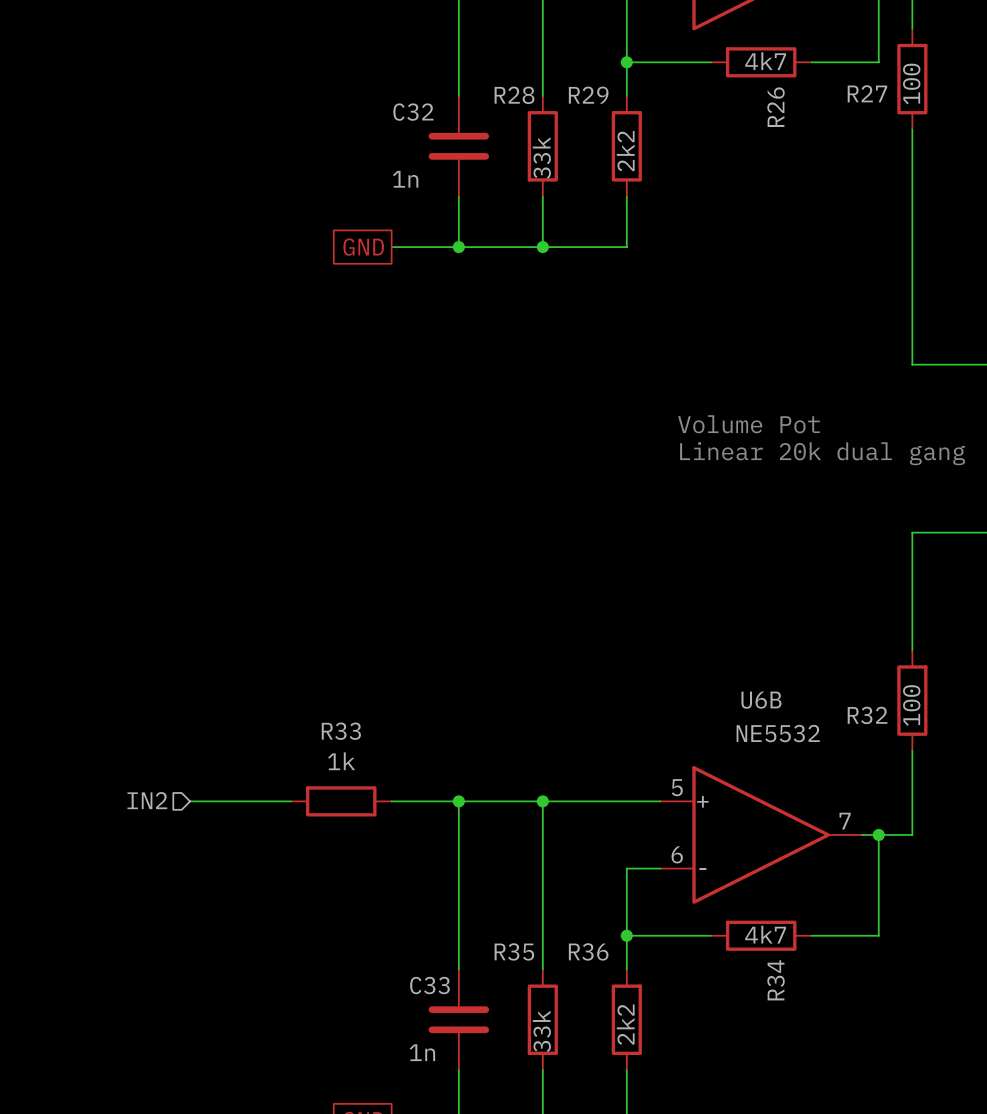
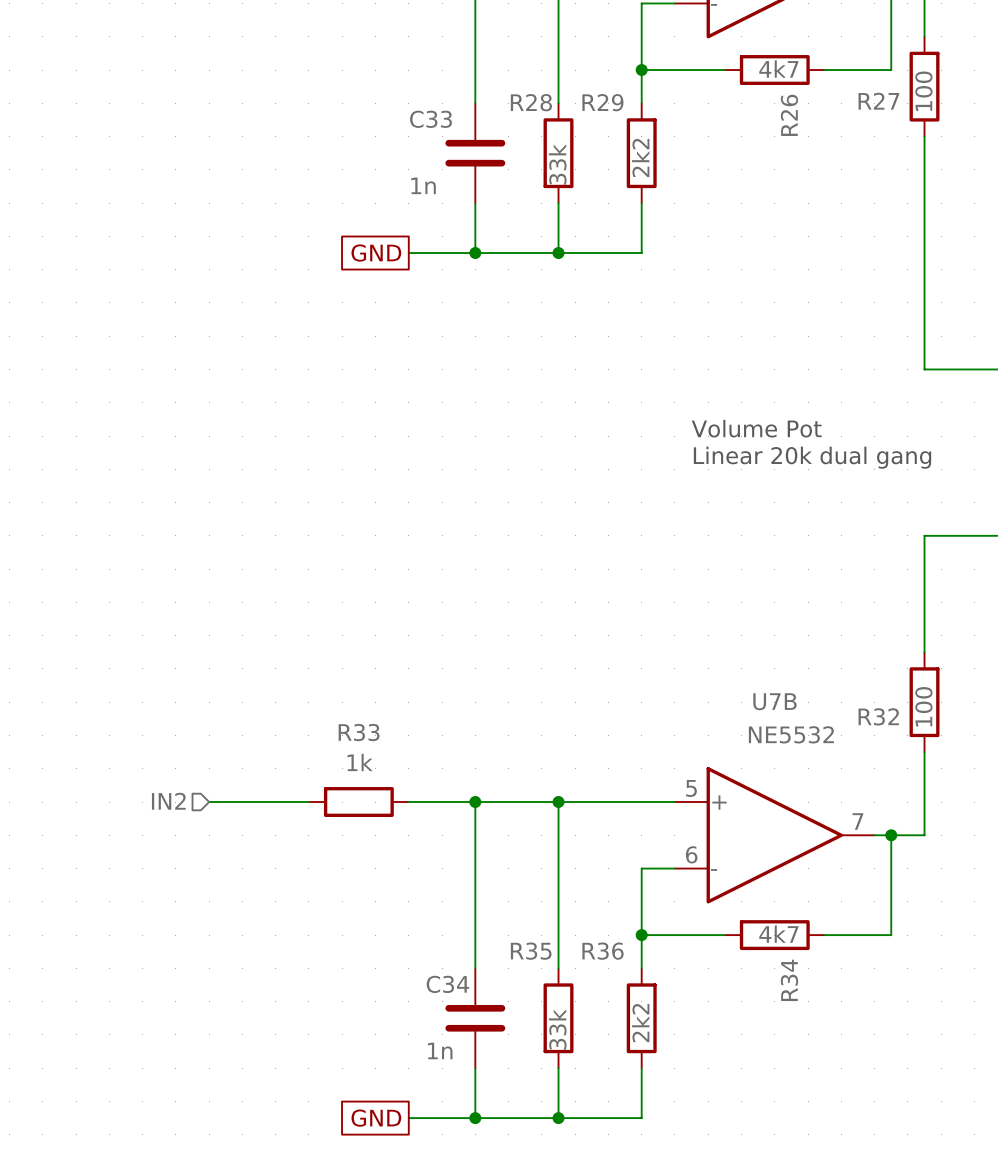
C32 name: C32 (413, 112) -> C33 (431, 119)
U6B name: U6B (761, 700) -> U7B (774, 701)
C33 name: C33 (429, 985) -> C34 (447, 984)

